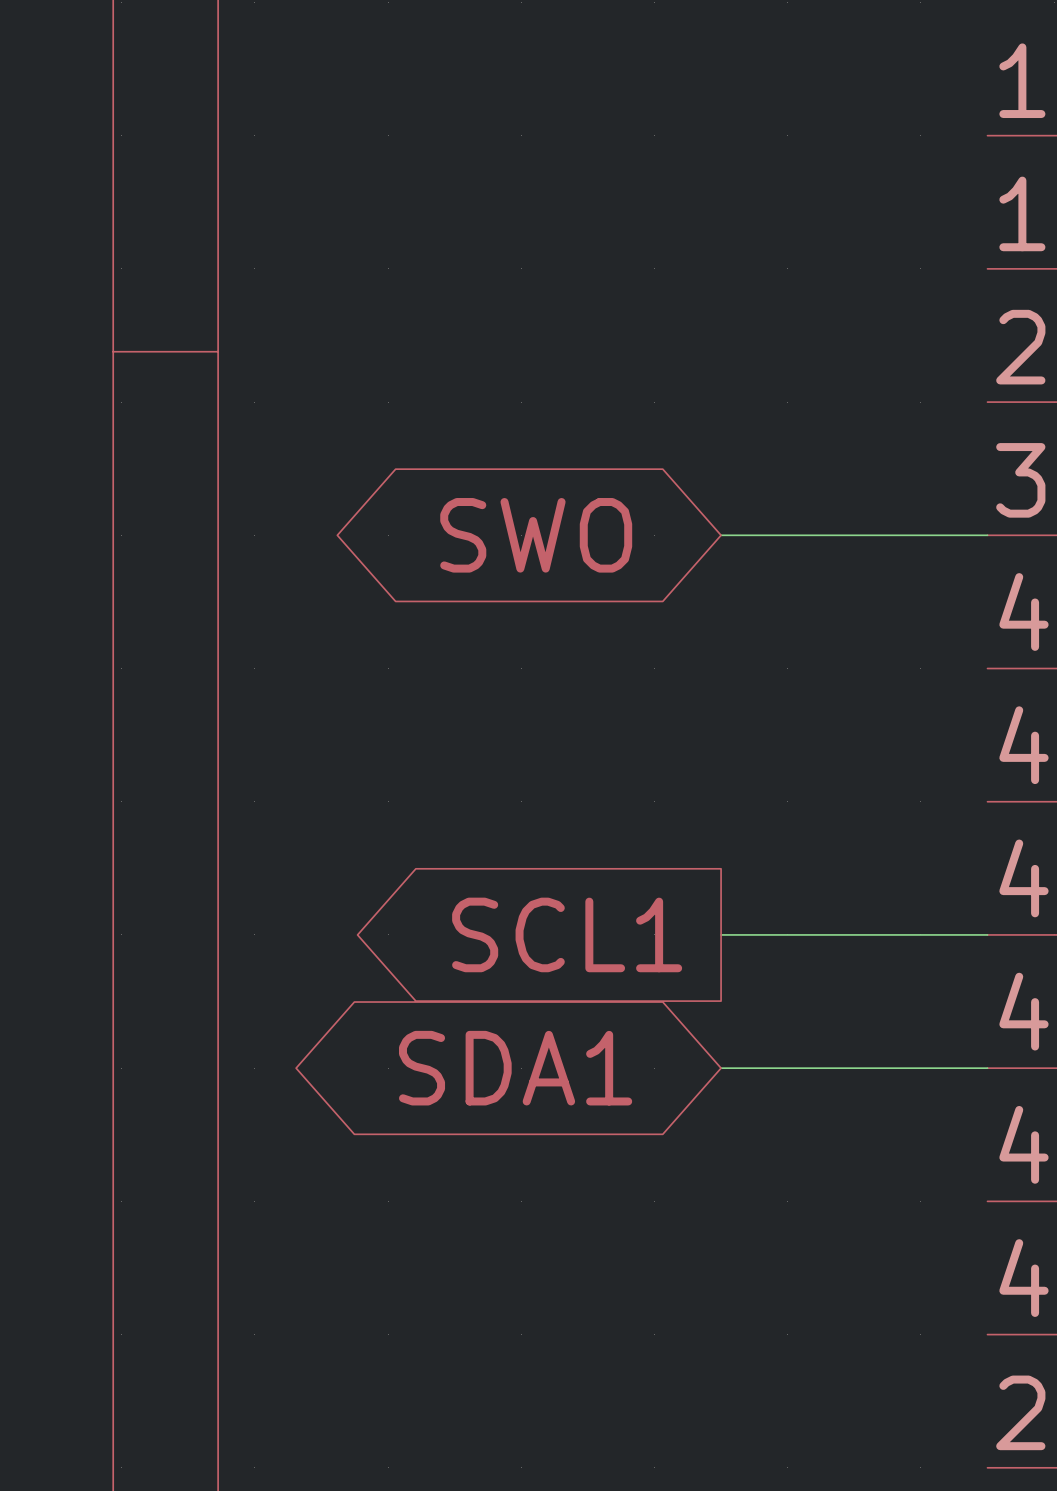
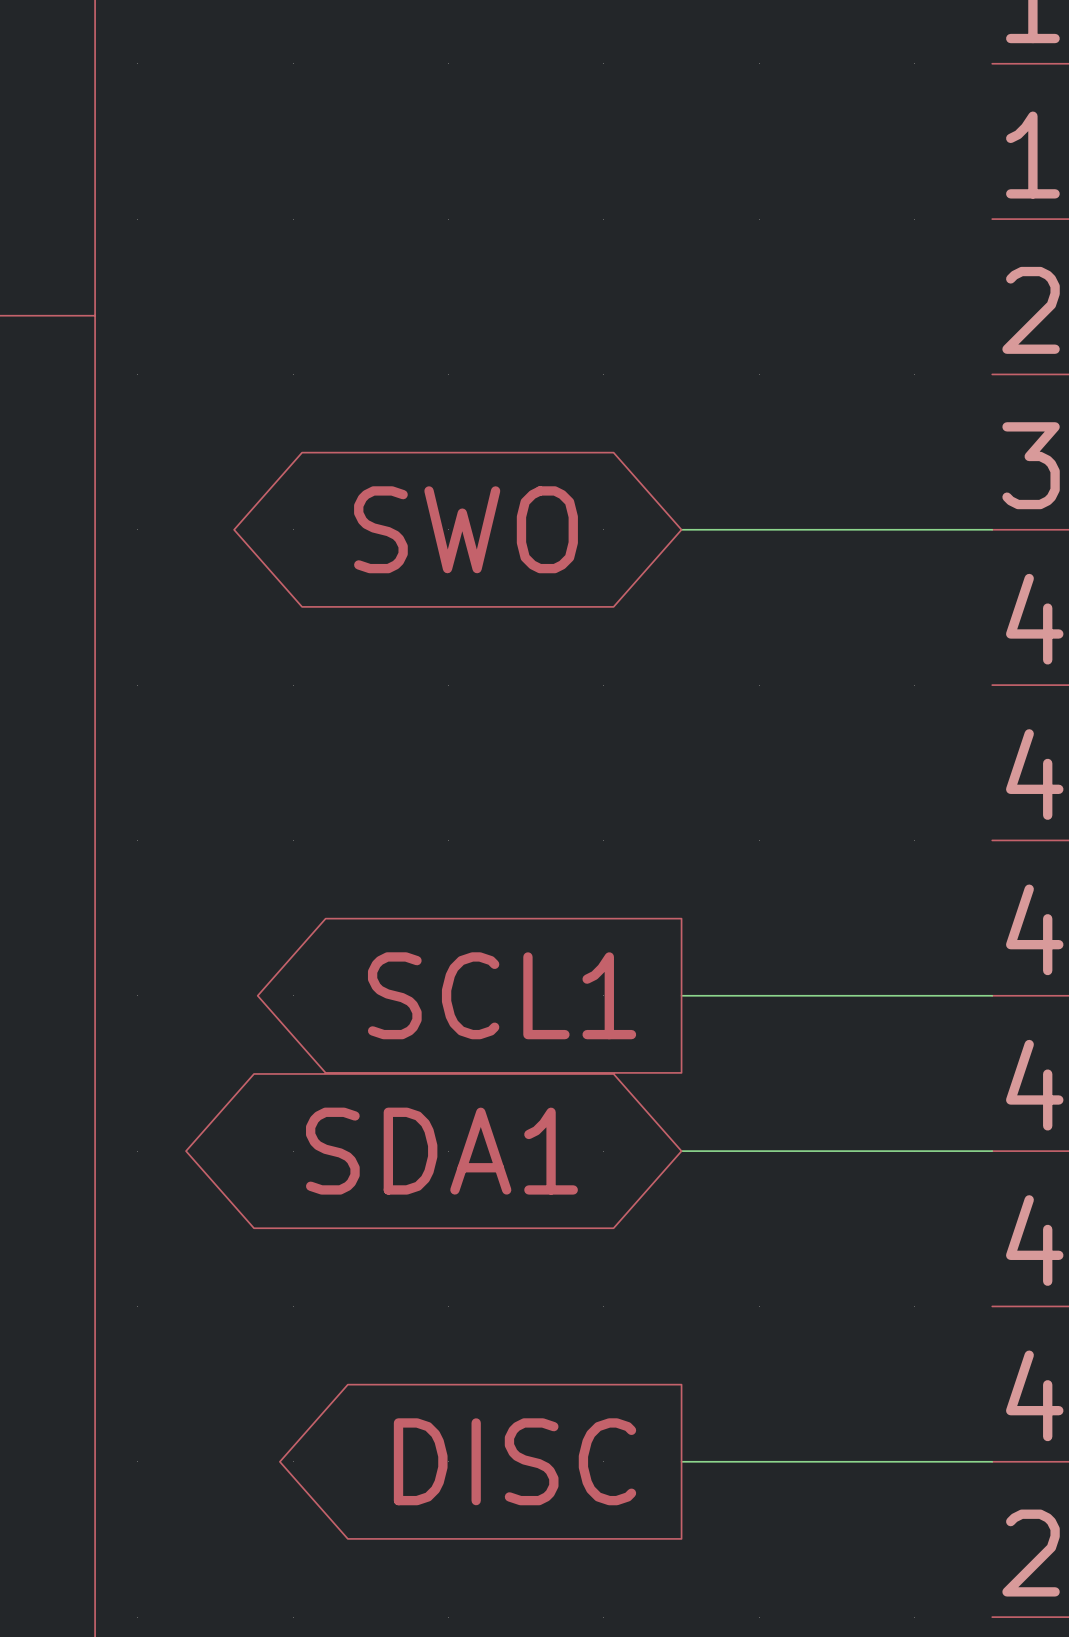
global label: none -> DISC (515, 1461)
wire: none -> (681, 1461) (992, 1461)

